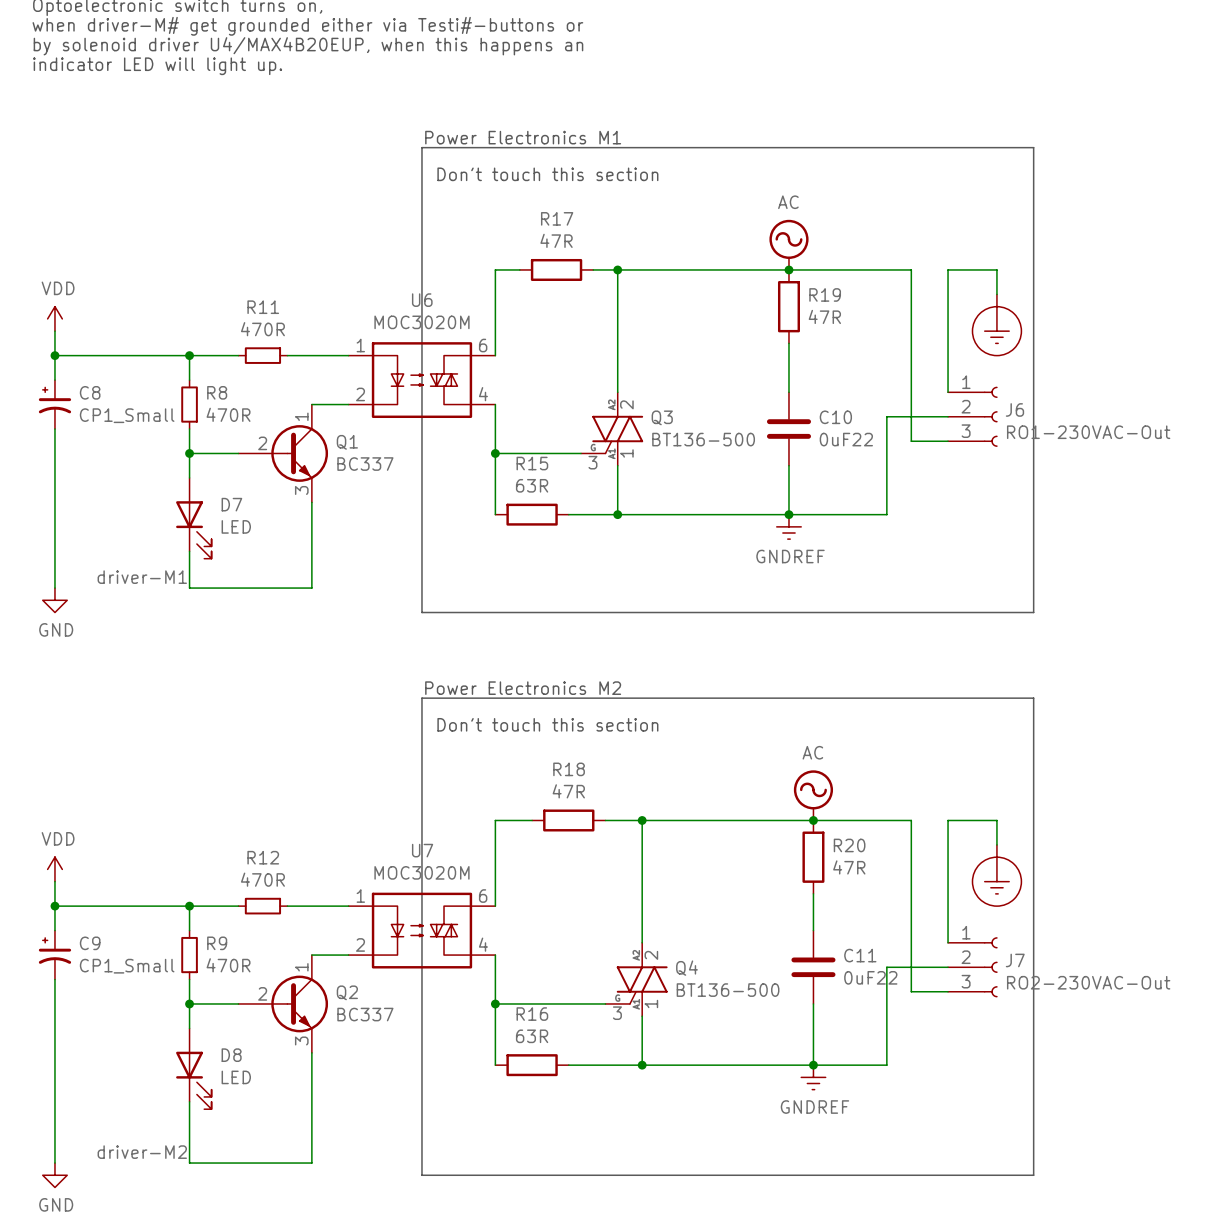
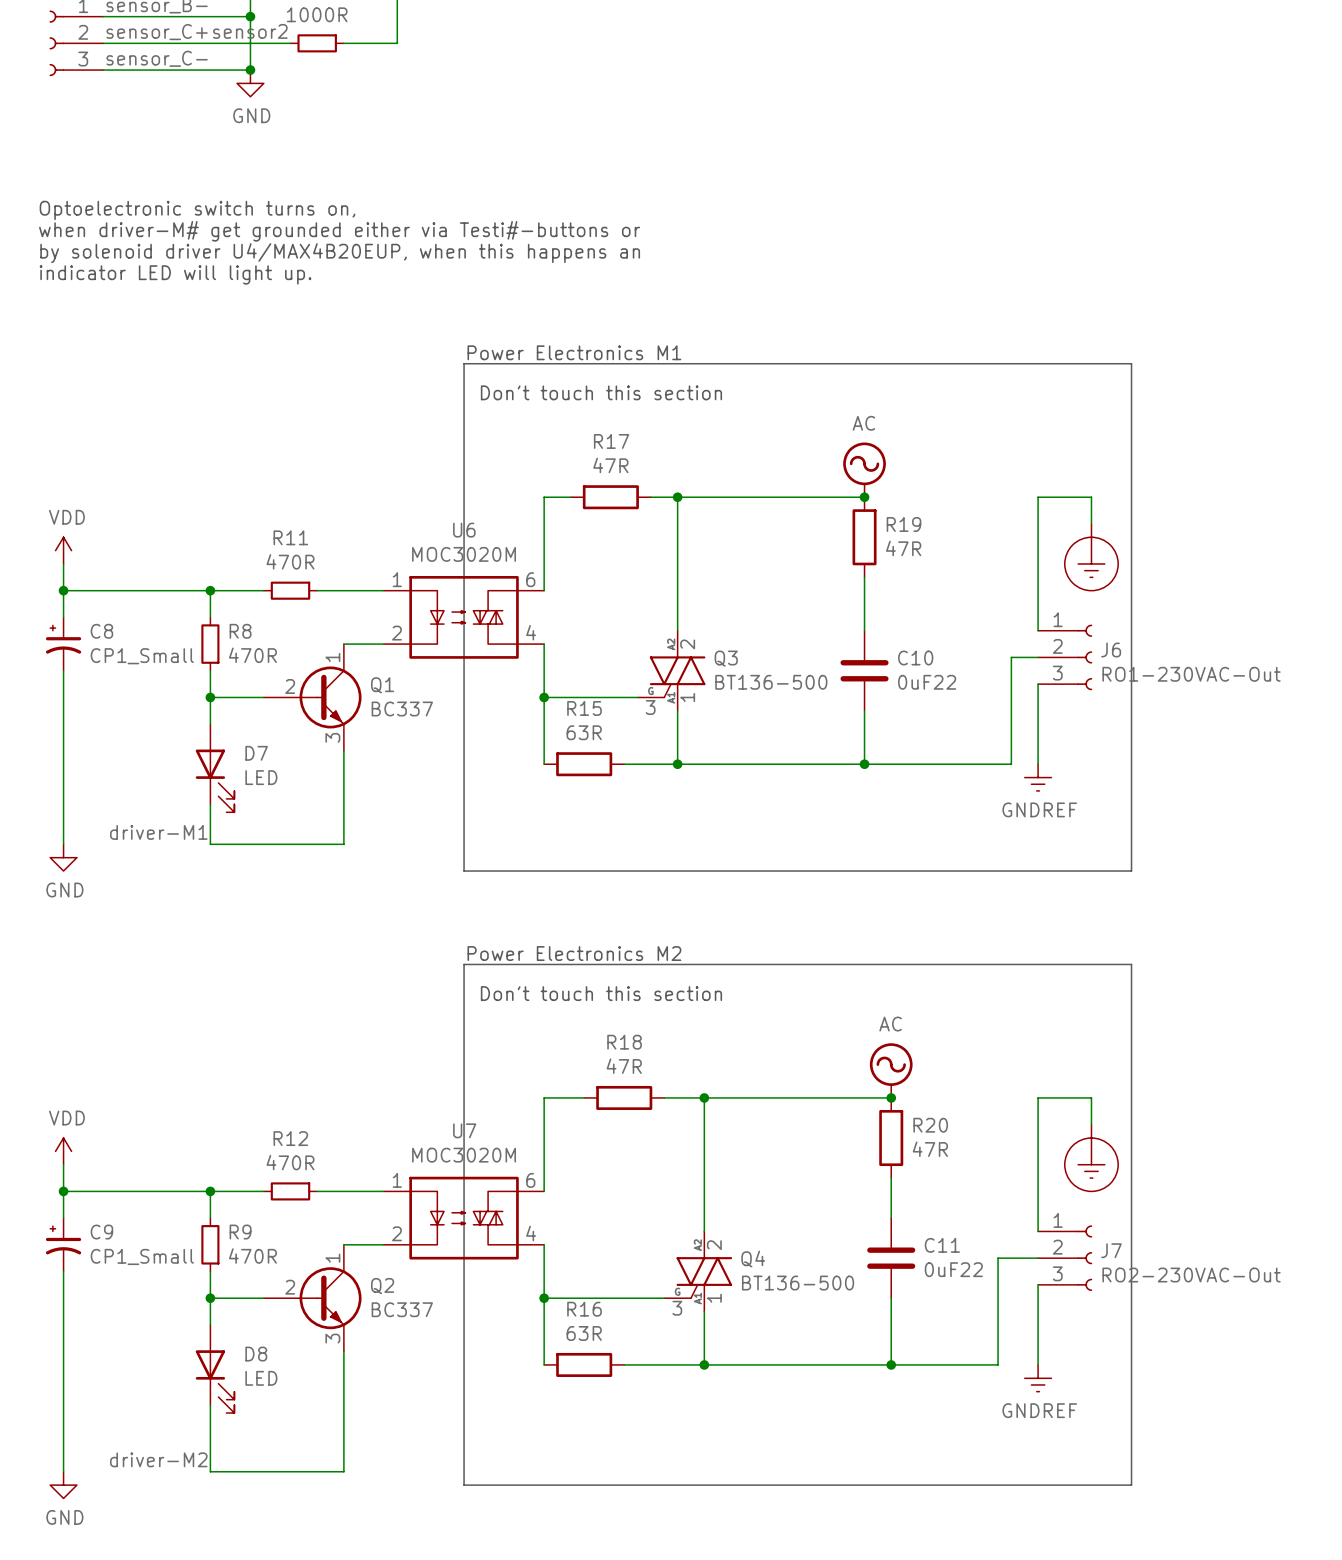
wire: (788, 269) (911, 269) (911, 441) (948, 441) -> (1038, 764) (1038, 684)
wire: (923, 416) (886, 416) (886, 514) -> (1011, 657) (1011, 764) (971, 764)
power symbol position: GNDREF (788, 526) -> GNDREF (1038, 777)
wire: (813, 820) (911, 820) (911, 967) (886, 967) (886, 1065) -> (998, 1284) (998, 1364) (971, 1364)
wire: (911, 991) (948, 991) -> (1038, 1364) (1038, 1284)
power symbol position: GNDREF (813, 1077) -> GNDREF (1038, 1378)

